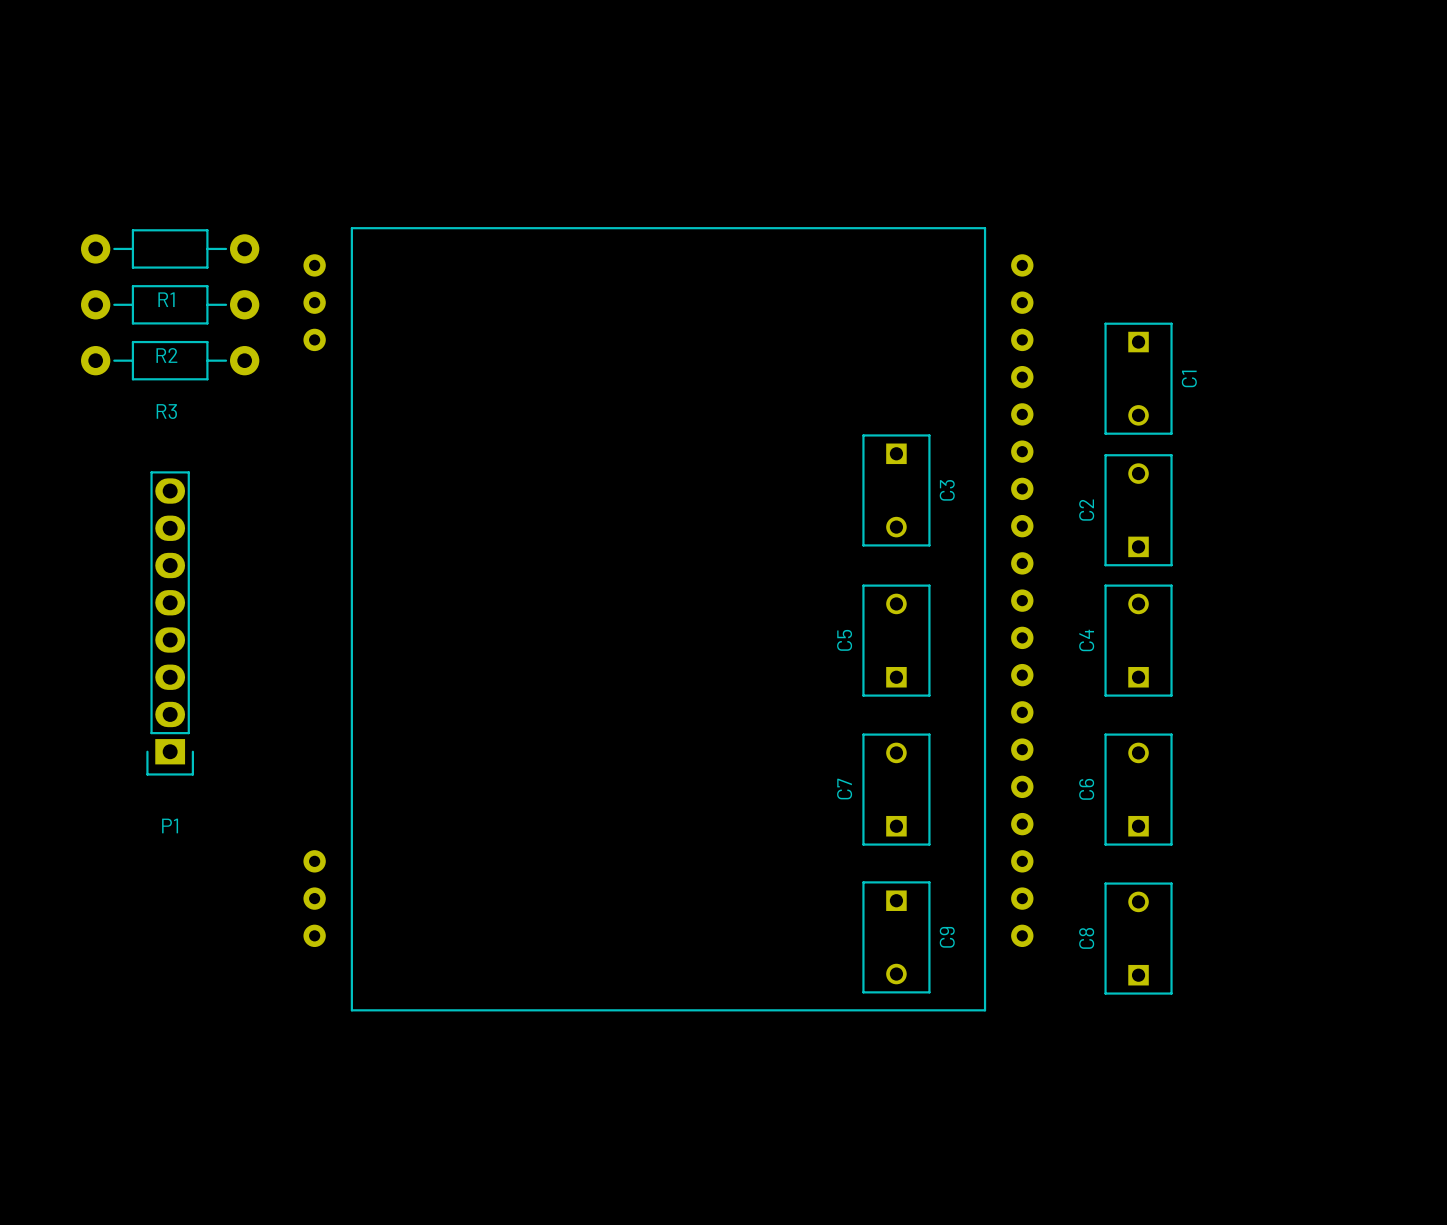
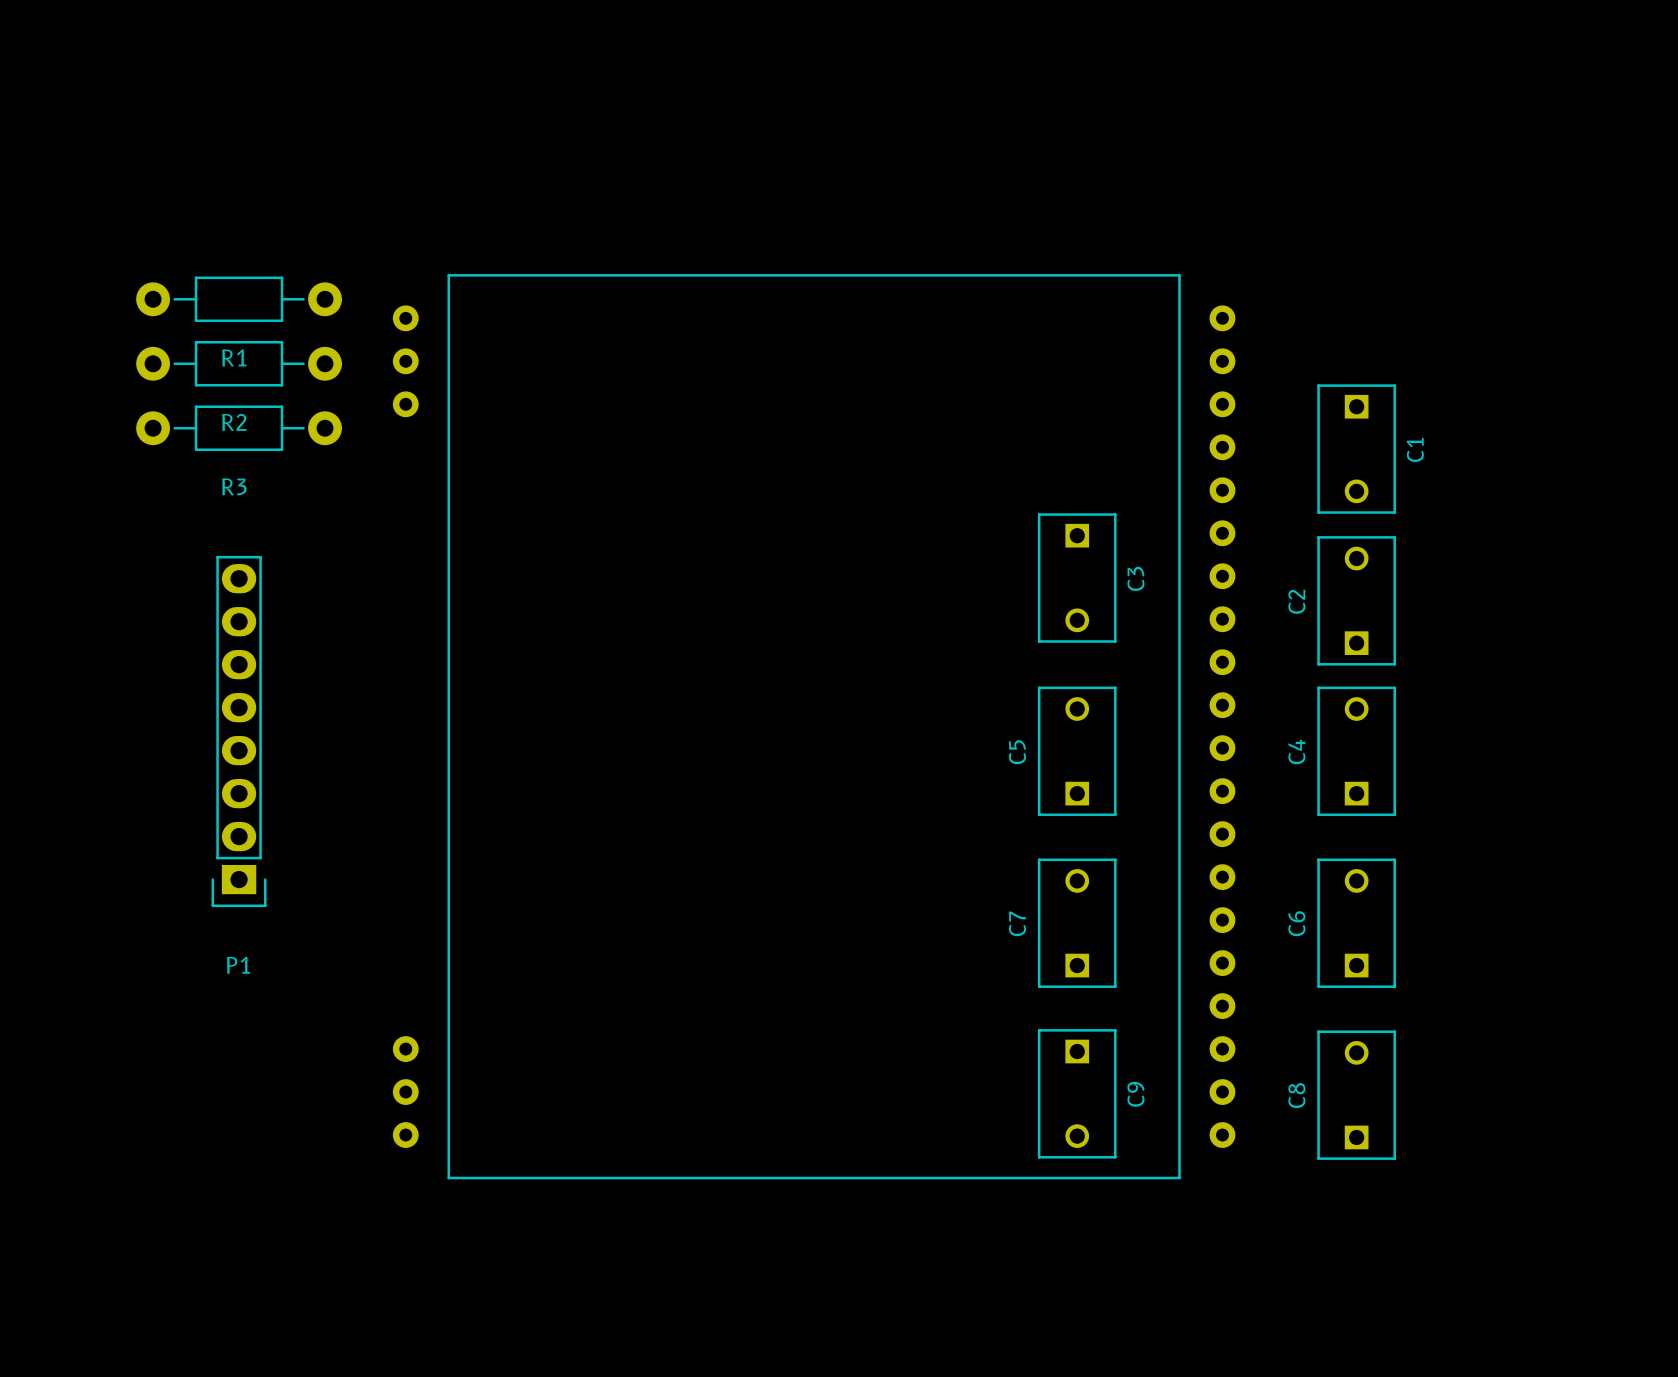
part footprint: [303, 227, 1034, 1012] -> [392, 274, 1236, 1180]

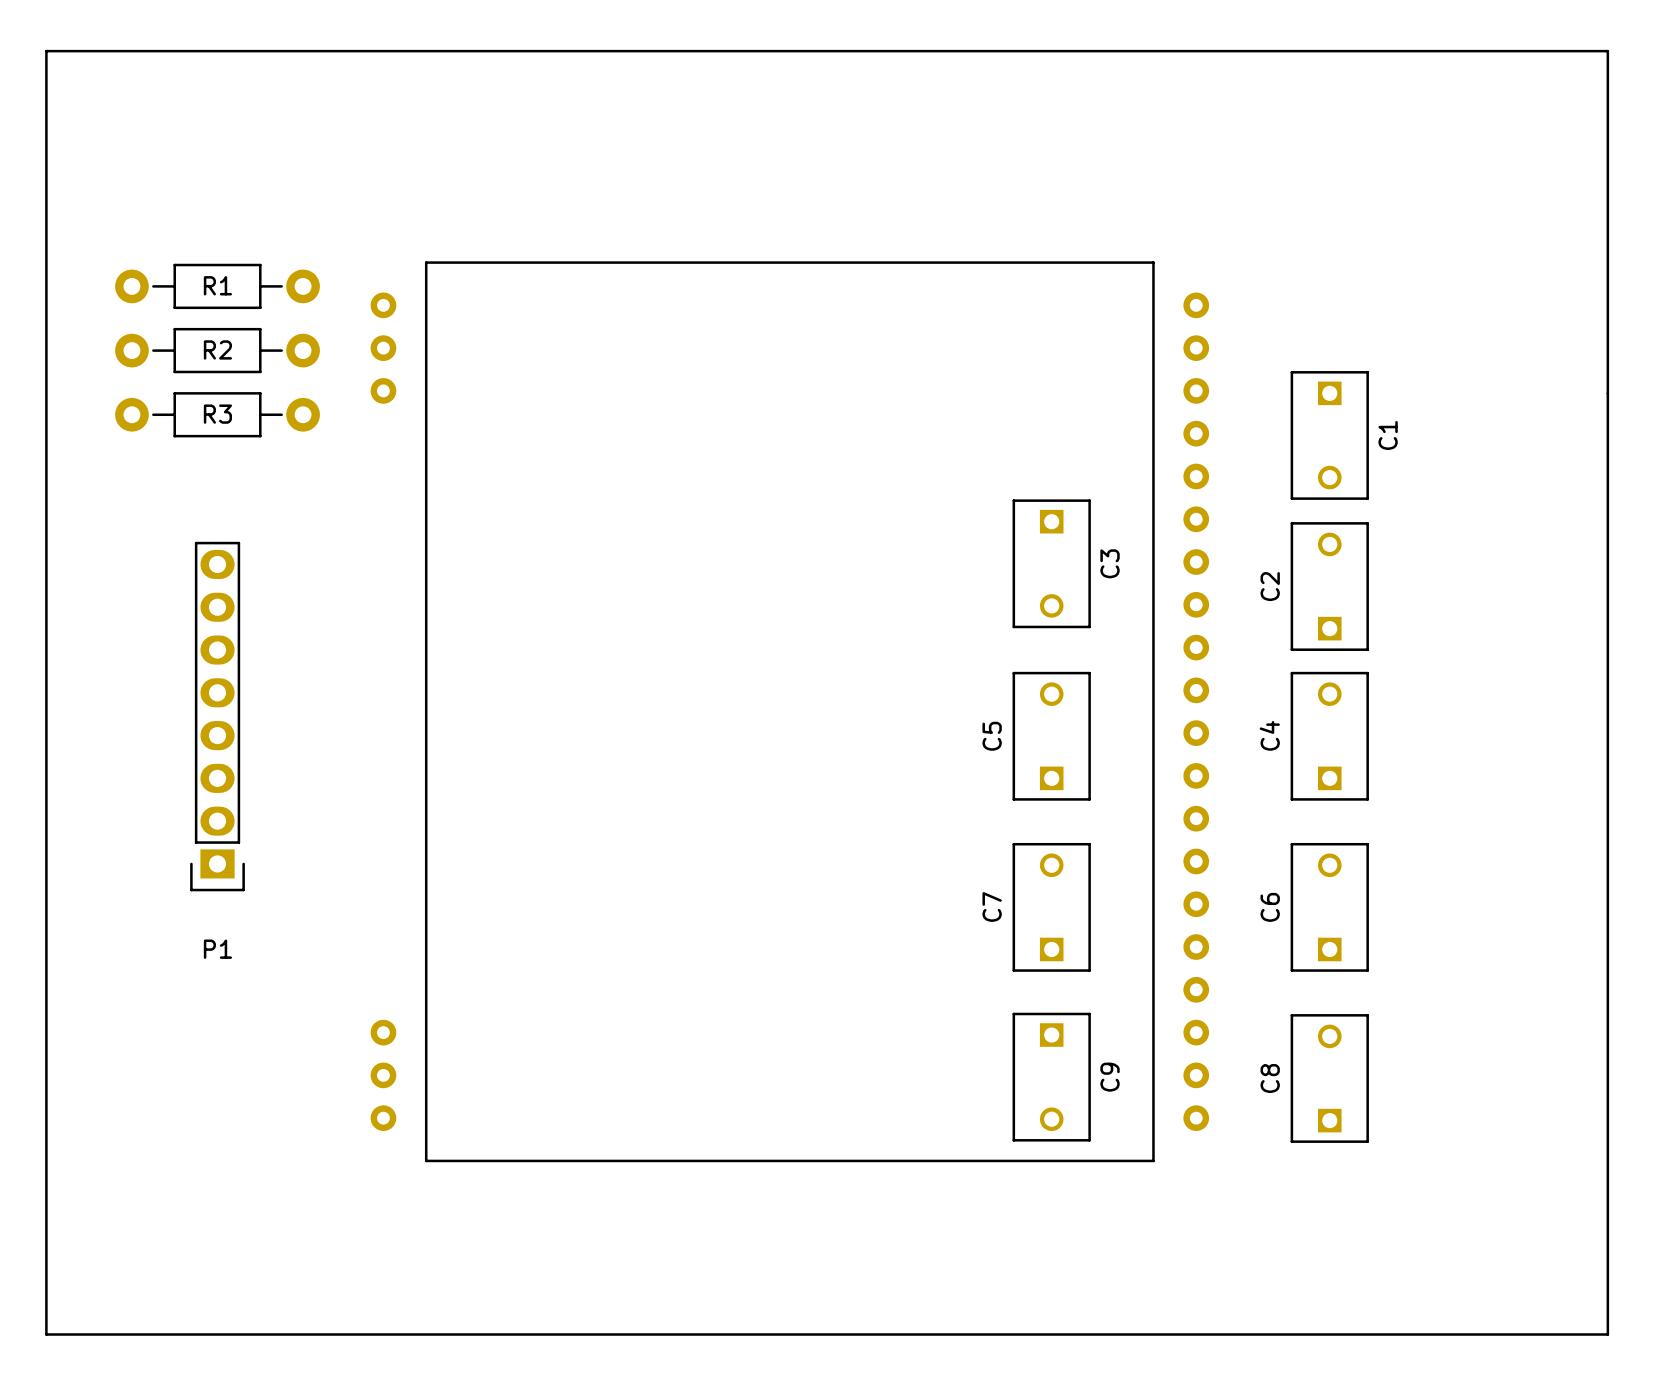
board edge: none -> (46, 51) (1607, 51) (1607, 1334) (46, 1334) (46, 51)
R1 name position: R1 (234, 357) -> R1 (217, 285)
R2 name position: R2 (234, 422) -> R2 (217, 349)
R3 name position: R3 (234, 486) -> R3 (217, 414)

